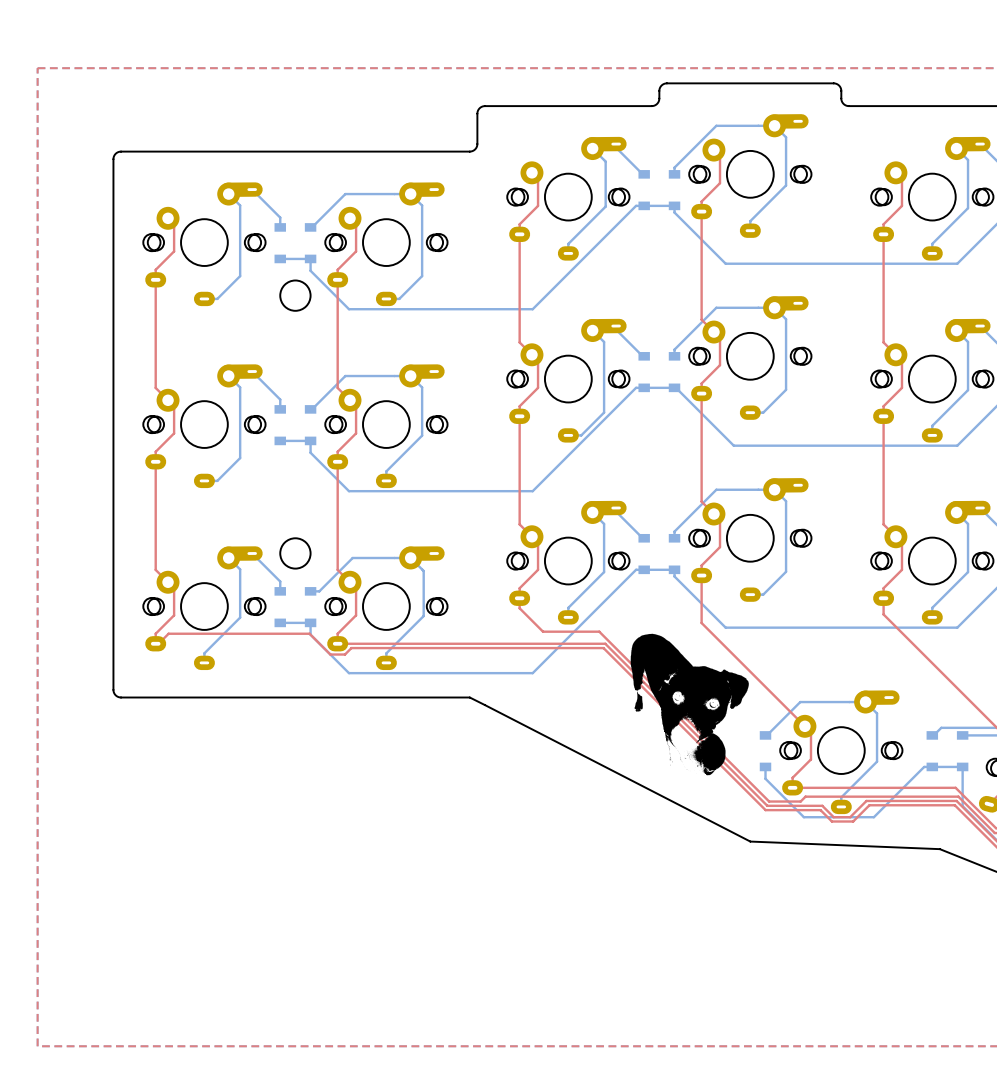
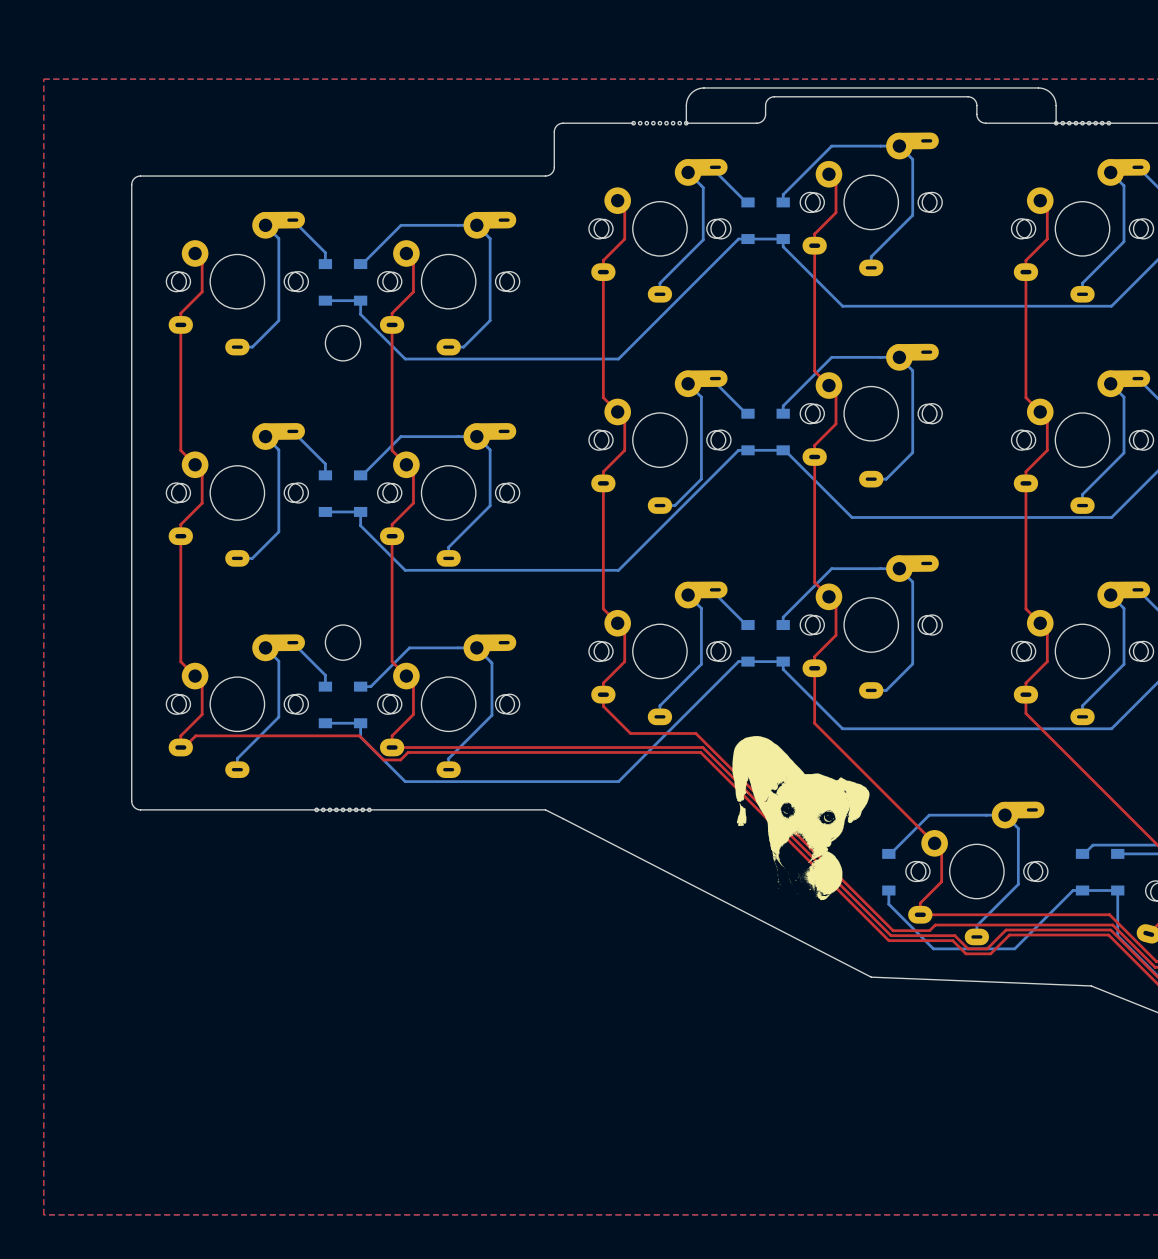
board edge: (545, 106) (591, 106) -> (1056, 123) (1055, 103) (1053, 96) (1047, 90) (1038, 87) (701, 88) (693, 91) (687, 98) (686, 123)
part: none -> (659, 123)
part: none -> (1082, 123)
part: none -> (343, 809)

